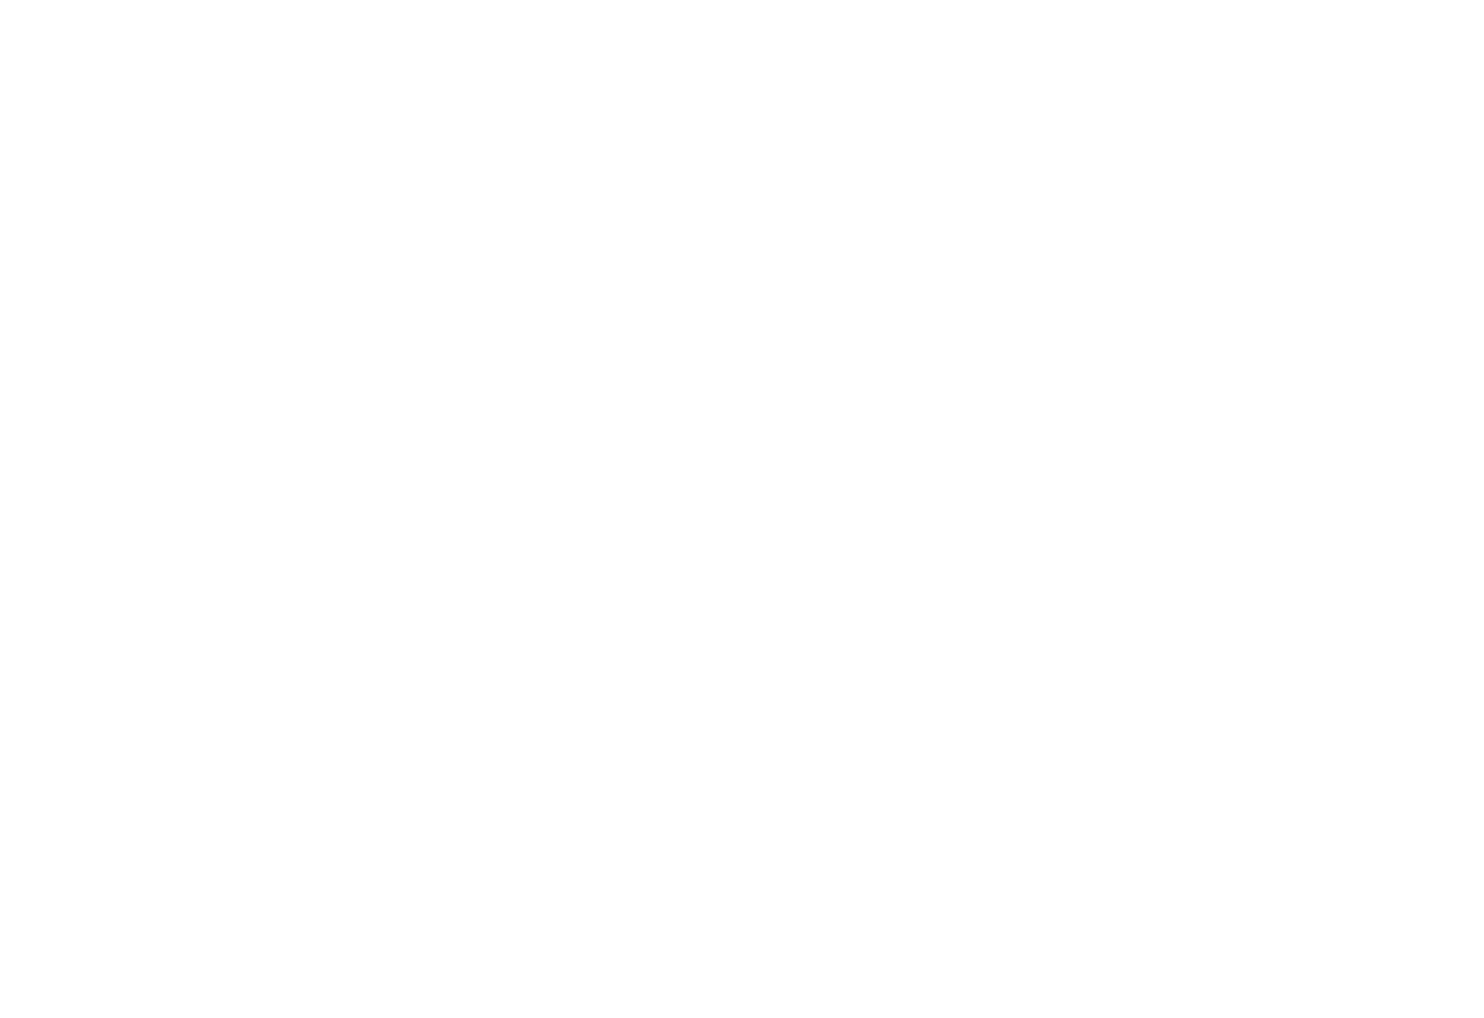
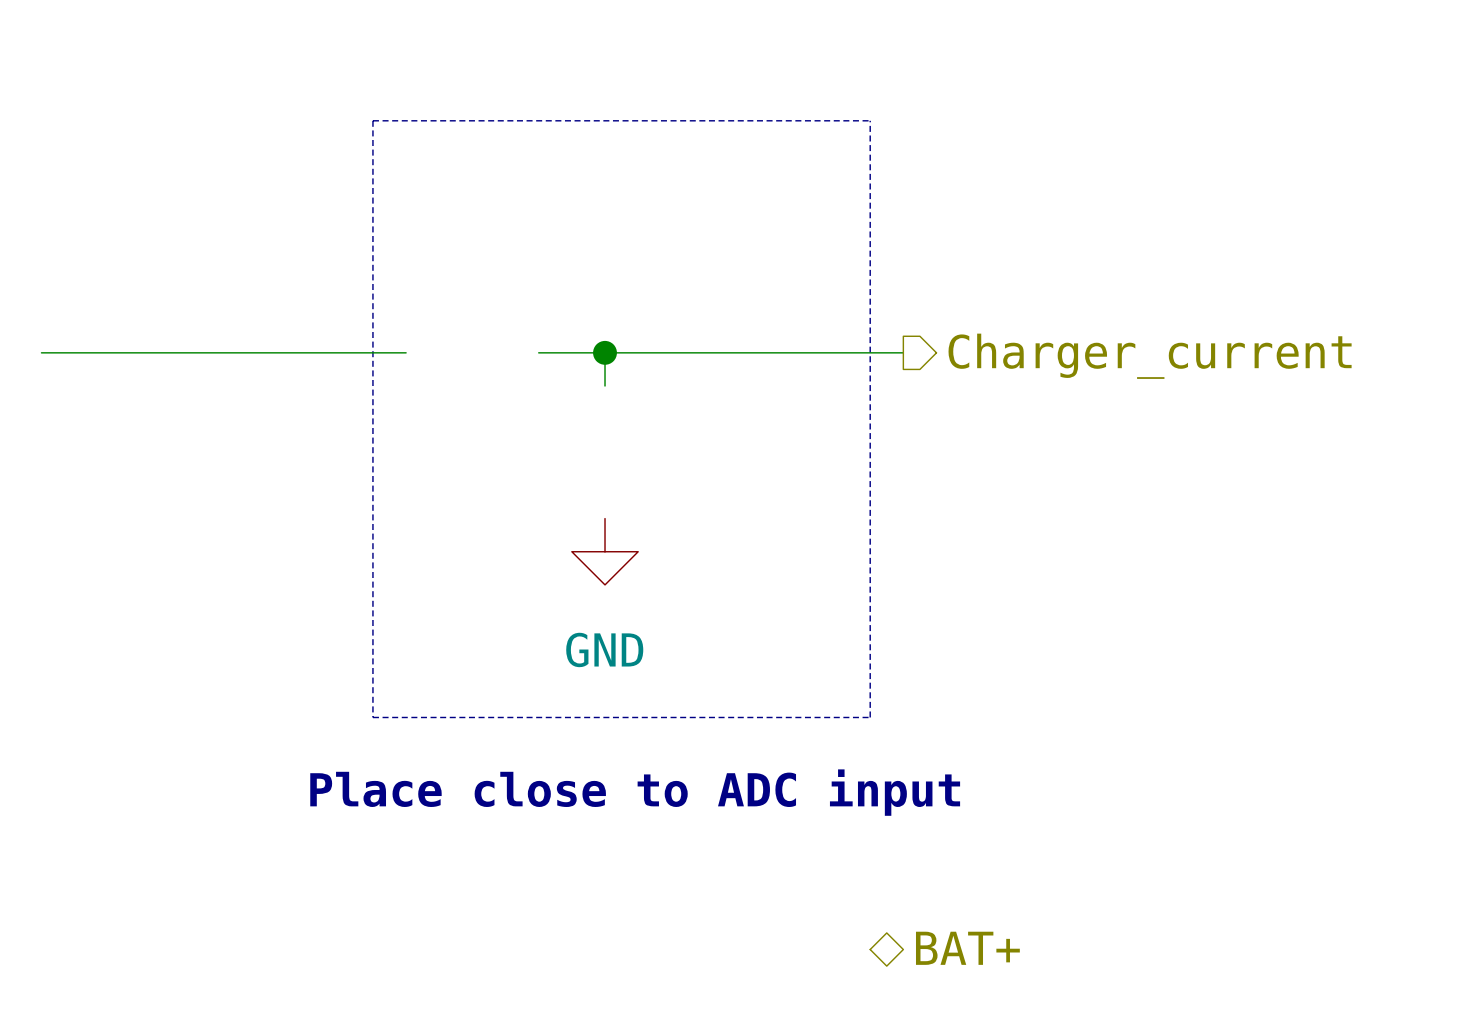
line: none -> (372, 120) (372, 717) (870, 717) (870, 120) (372, 120)
wire: none -> (41, 352) (406, 352)
wire: none -> (538, 352) (903, 352)
wire: none -> (605, 352) (605, 385)
junction: none -> (605, 352)
hierarchical label: none -> Charger_current (1150, 356)
power symbol: none -> GND (605, 551)
text: none -> Place close to ADC input (635, 792)
hierarchical label: none -> BAT+ (967, 948)

